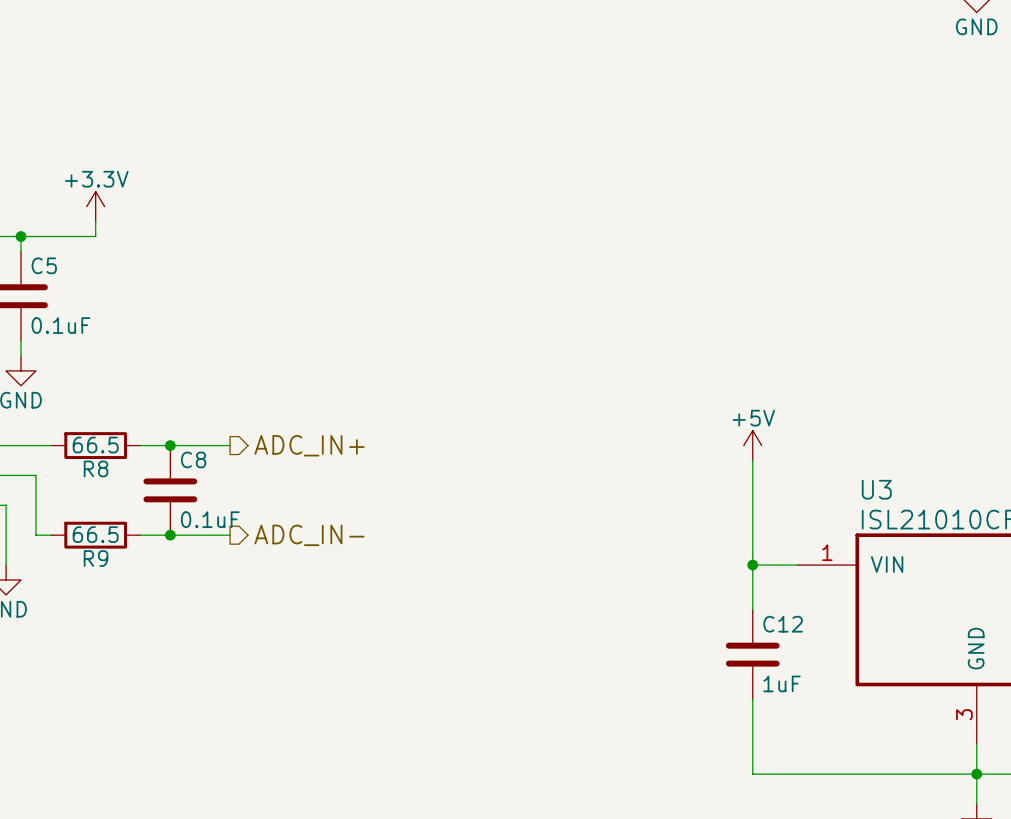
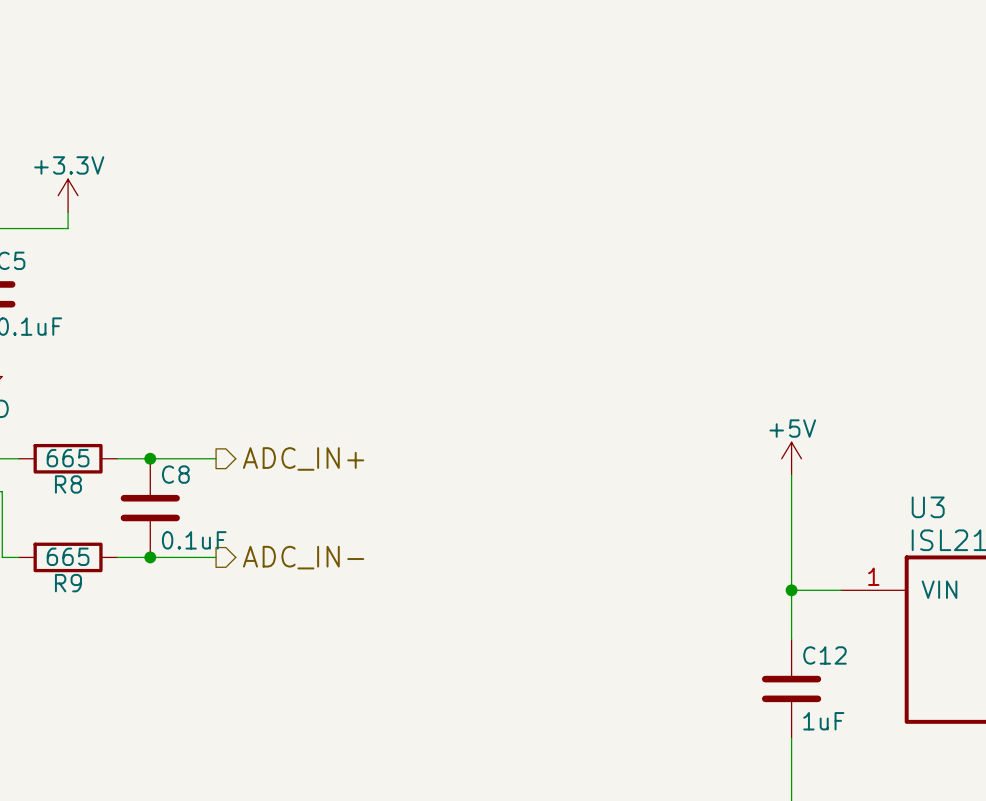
R8 value: 66.5 (95, 445) -> 665 (68, 458)
R9 value: 66.5 (95, 534) -> 665 (68, 556)

